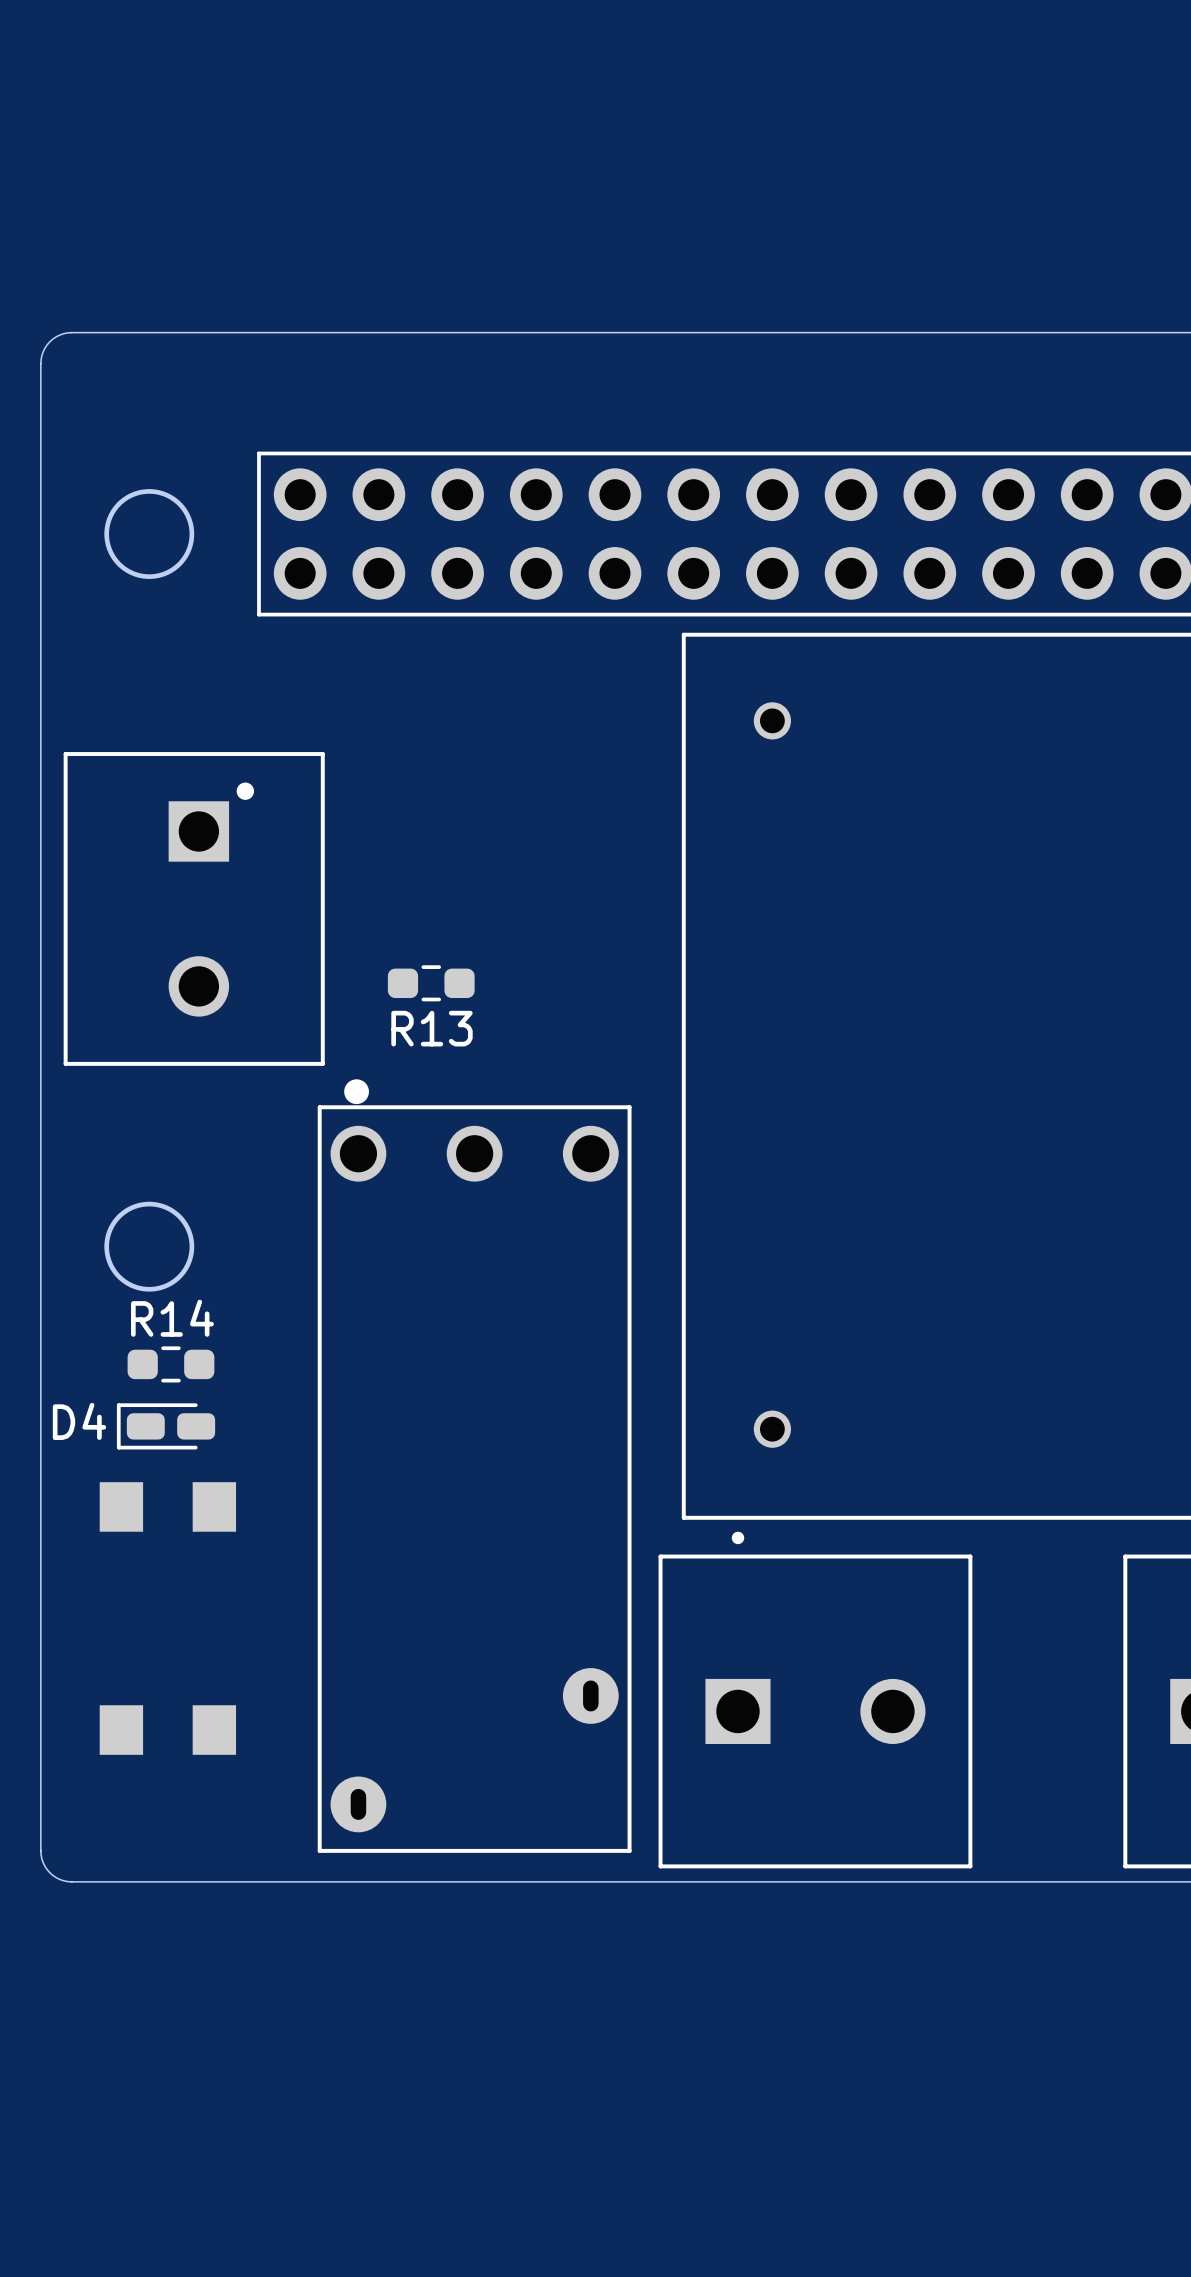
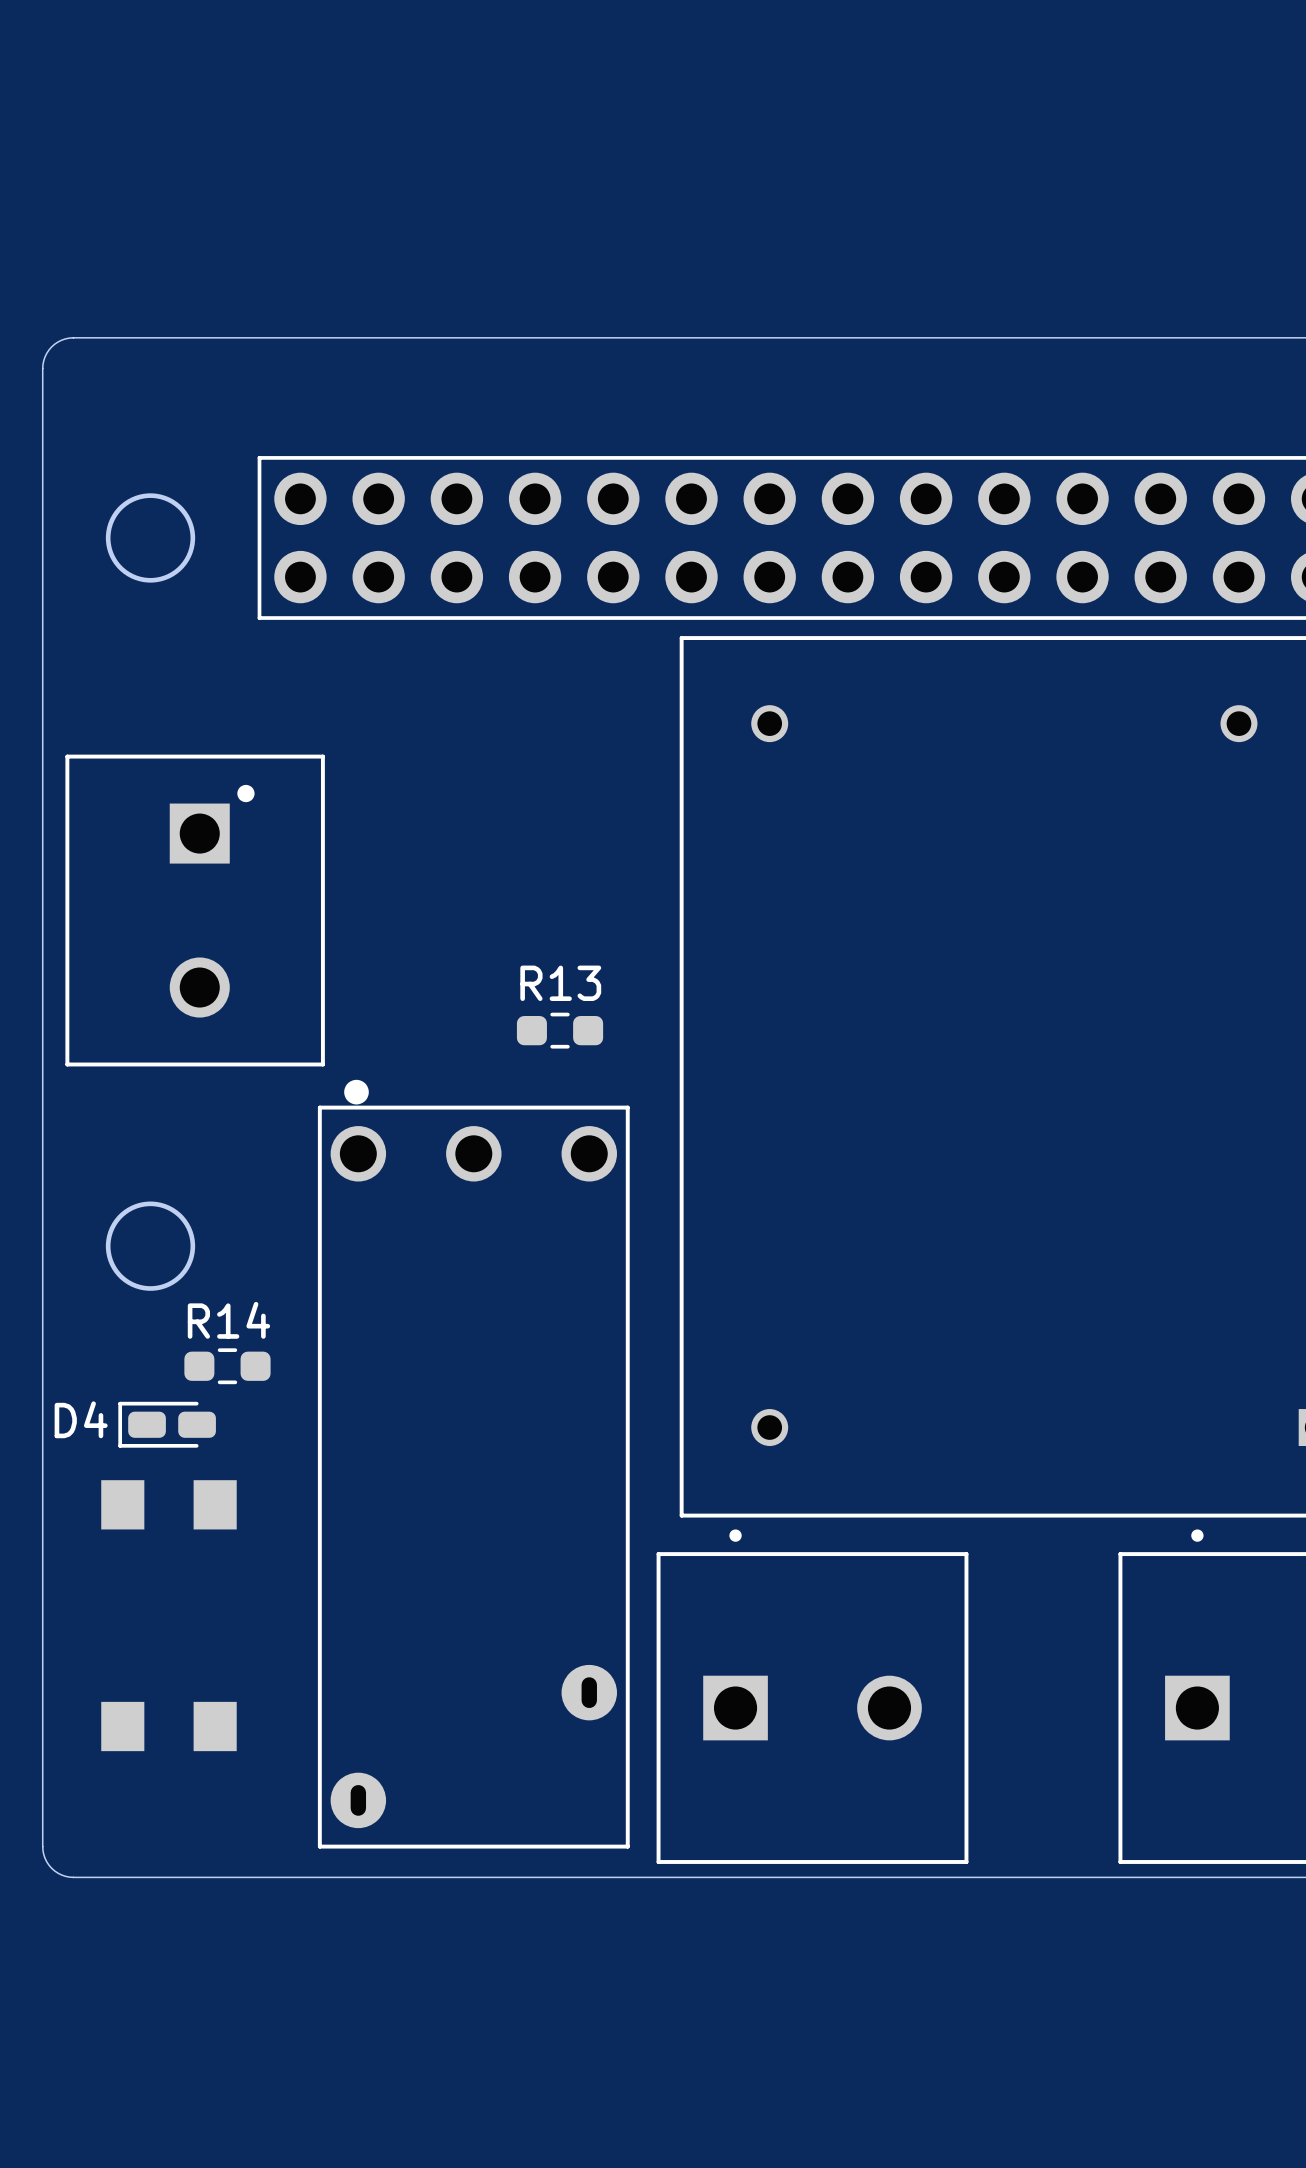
R13 position: (431, 983) -> (560, 1030)
R13 name position: R13 (431, 1028) -> R13 (560, 983)
R14 position: (170, 1364) -> (227, 1366)

